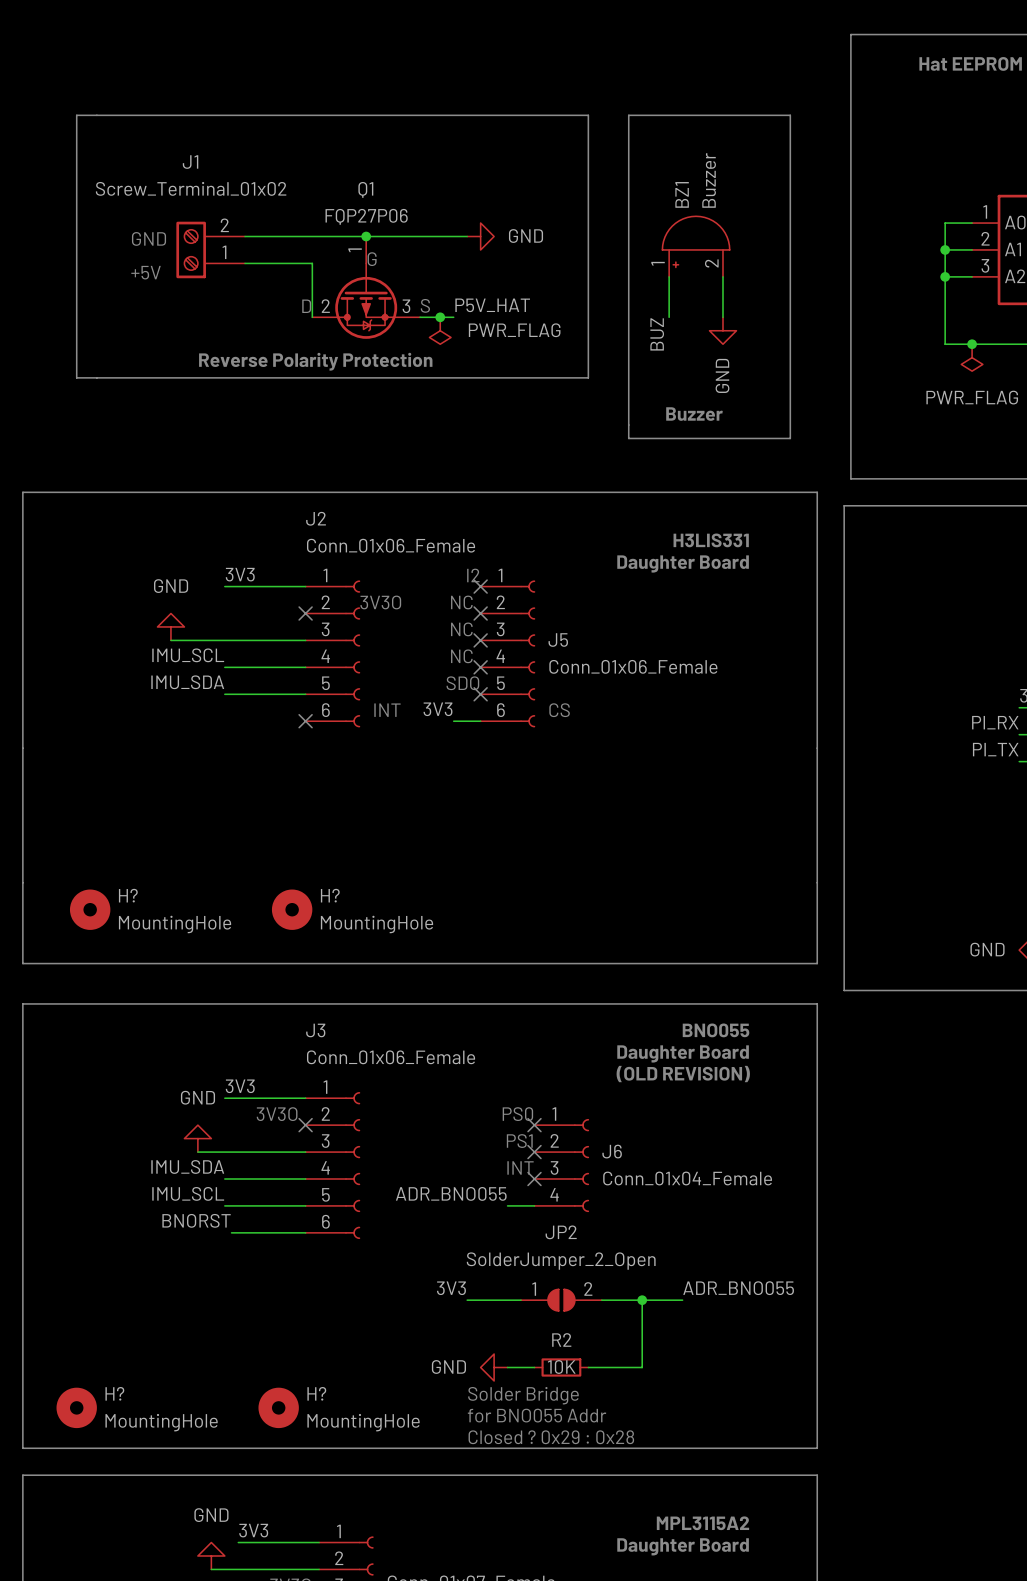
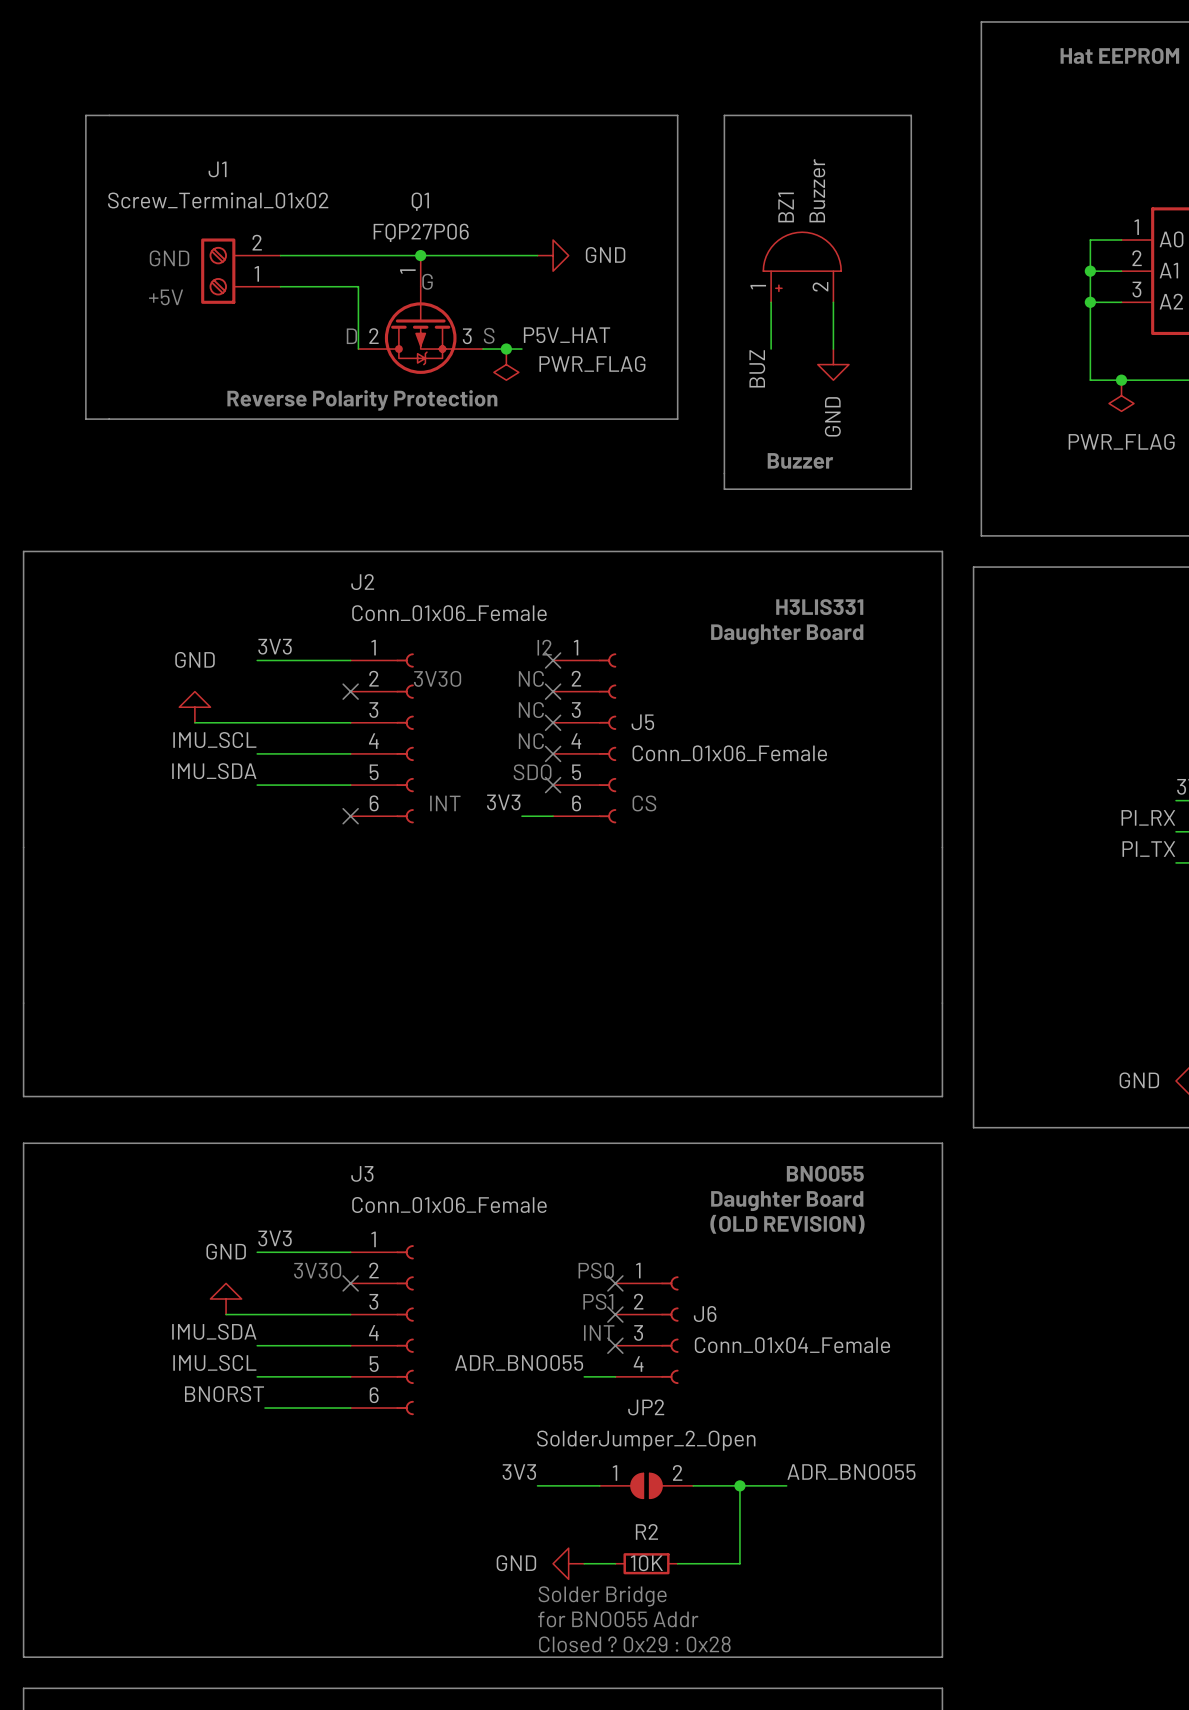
H?: MountingHole (90, 909) -> none
H?: MountingHole (292, 909) -> none
H?: MountingHole (76, 1407) -> none
H?: MountingHole (278, 1407) -> none

